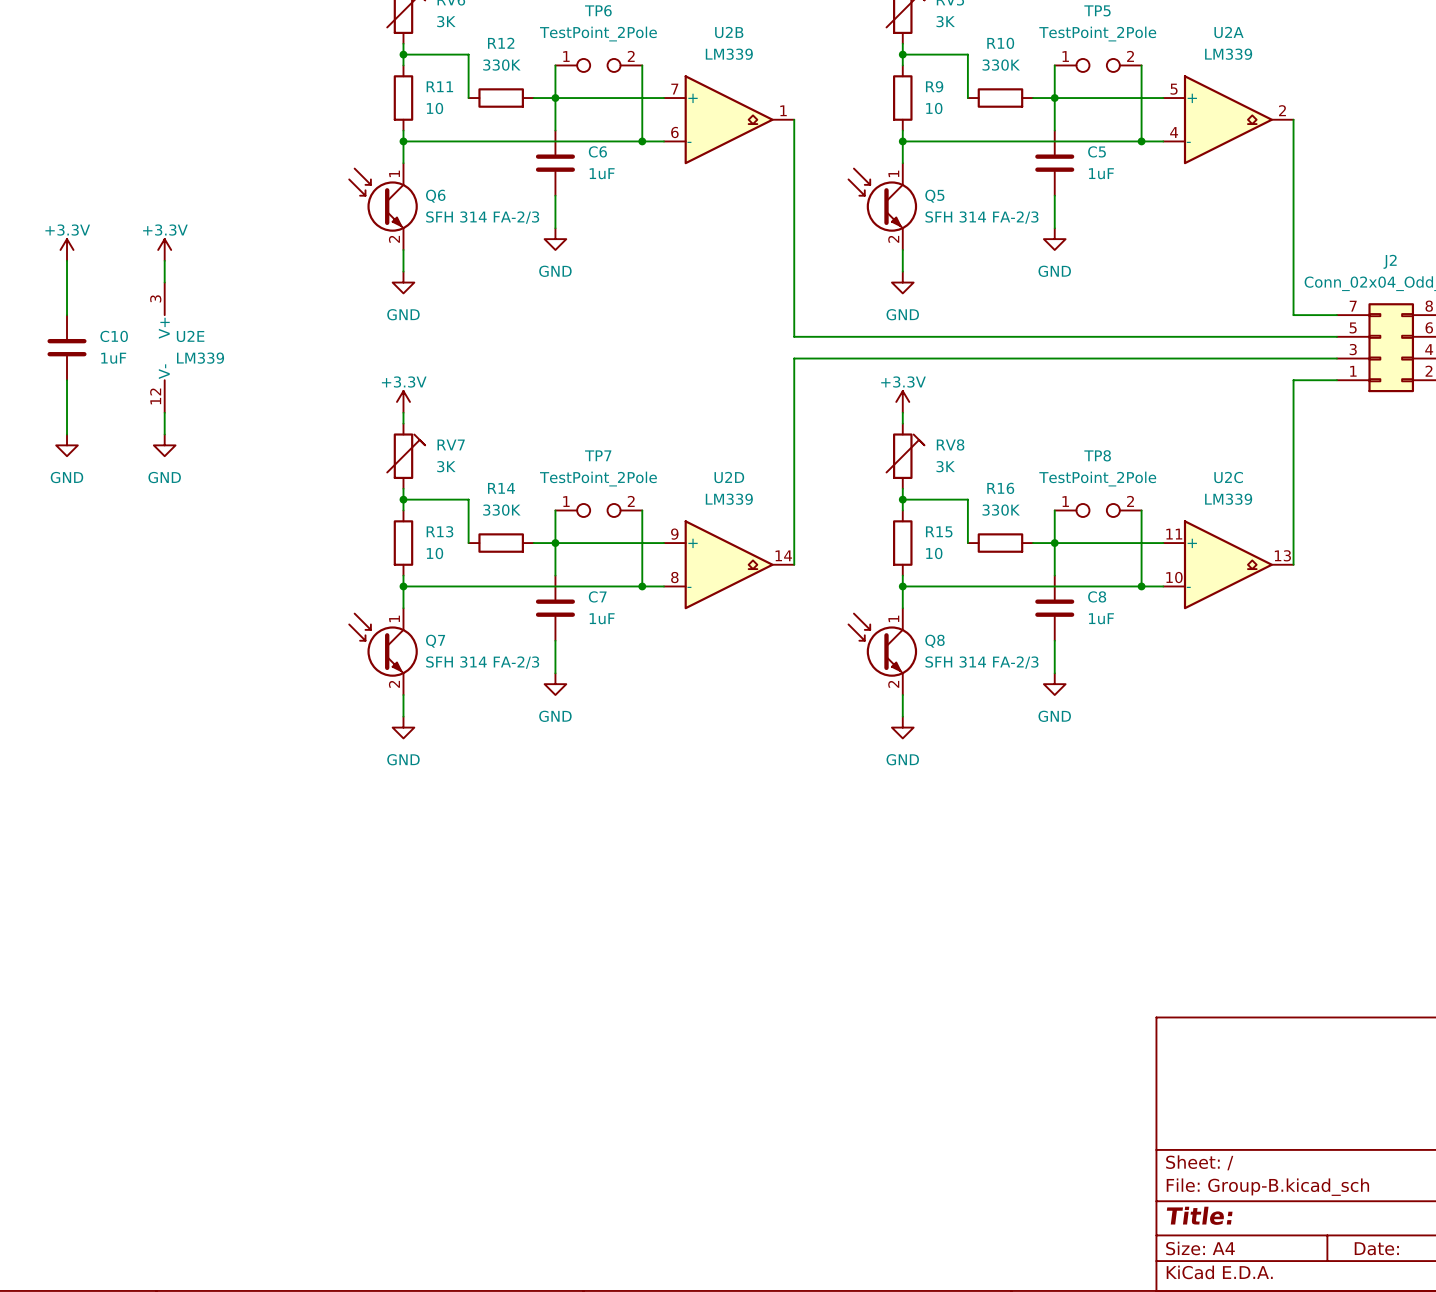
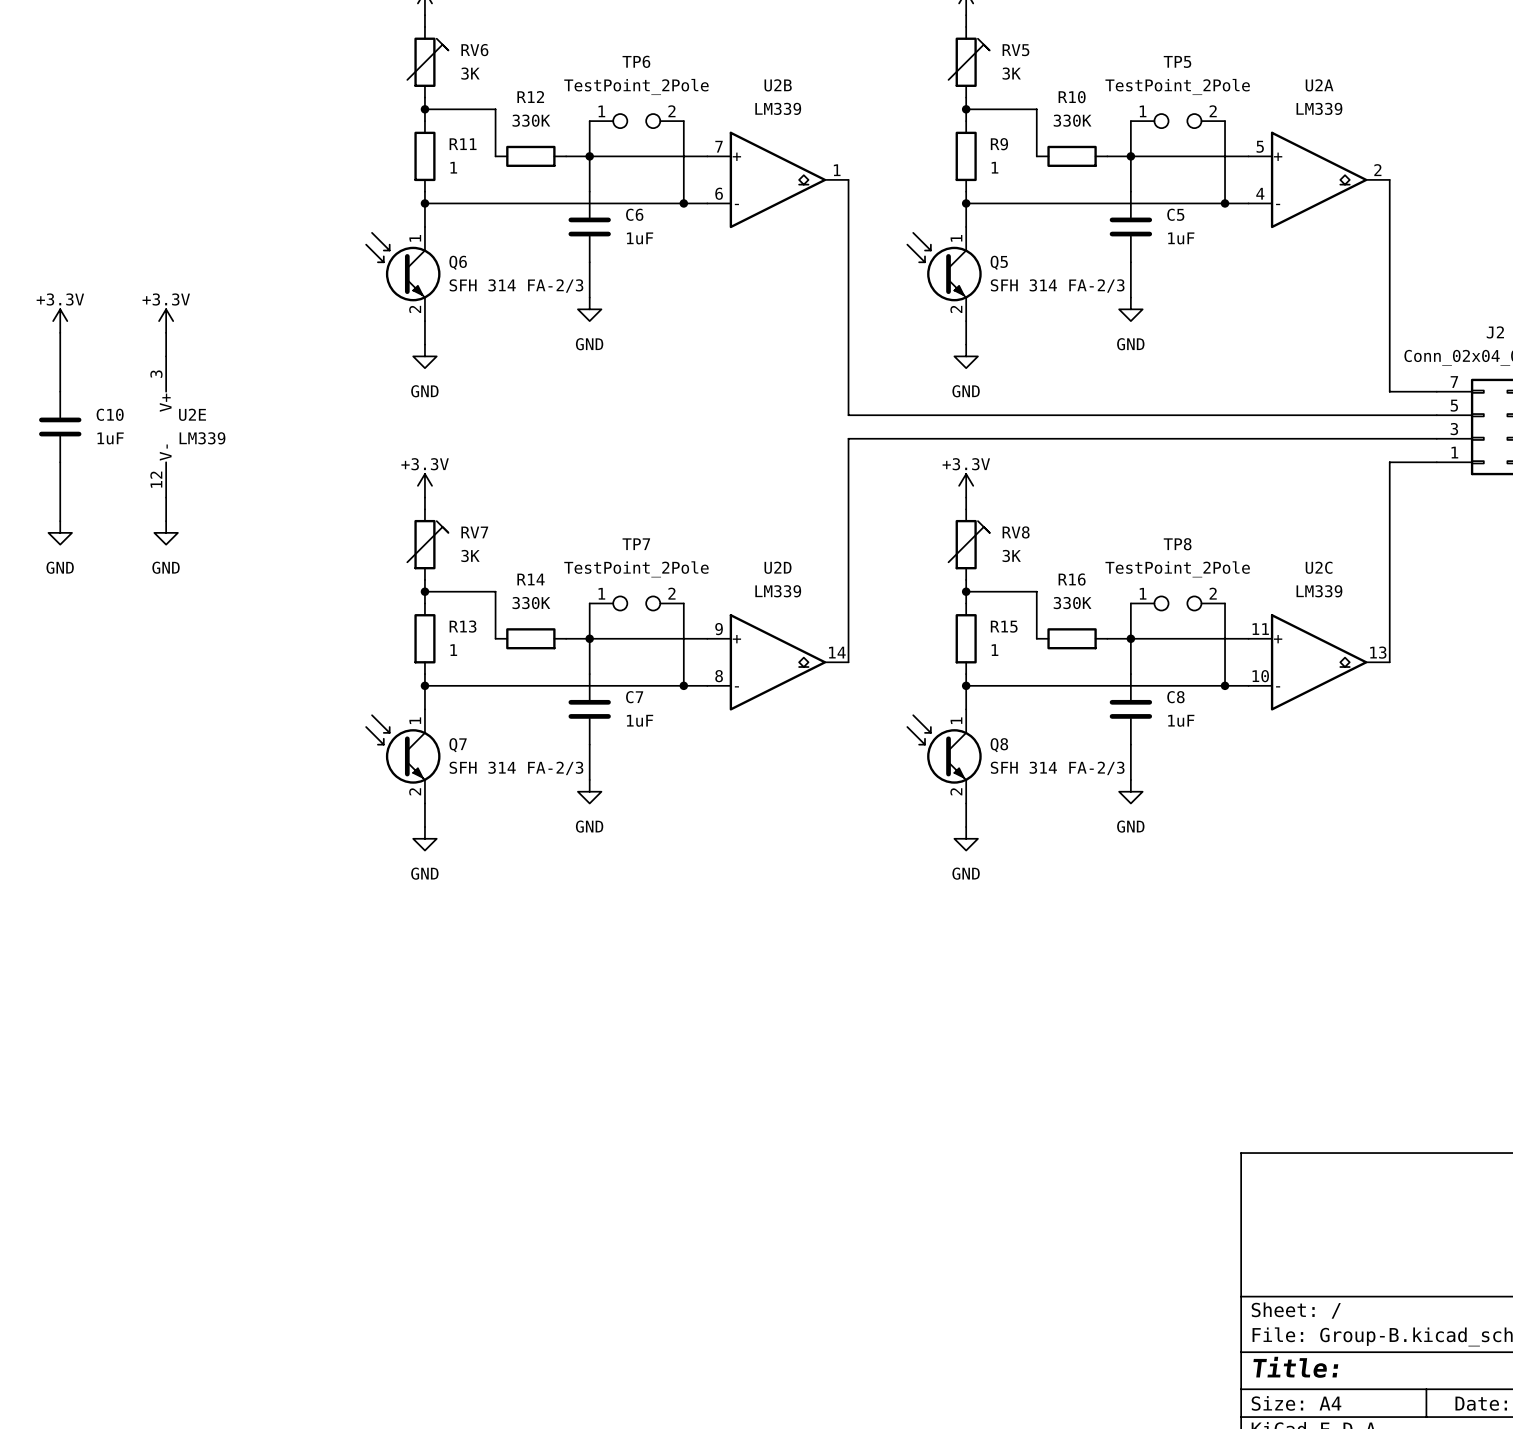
R11 value: 10 (434, 108) -> 1 (453, 167)
R9 value: 10 (934, 108) -> 1 (994, 167)
R13 value: 10 (434, 553) -> 1 (453, 650)
R15 value: 10 (934, 553) -> 1 (994, 650)

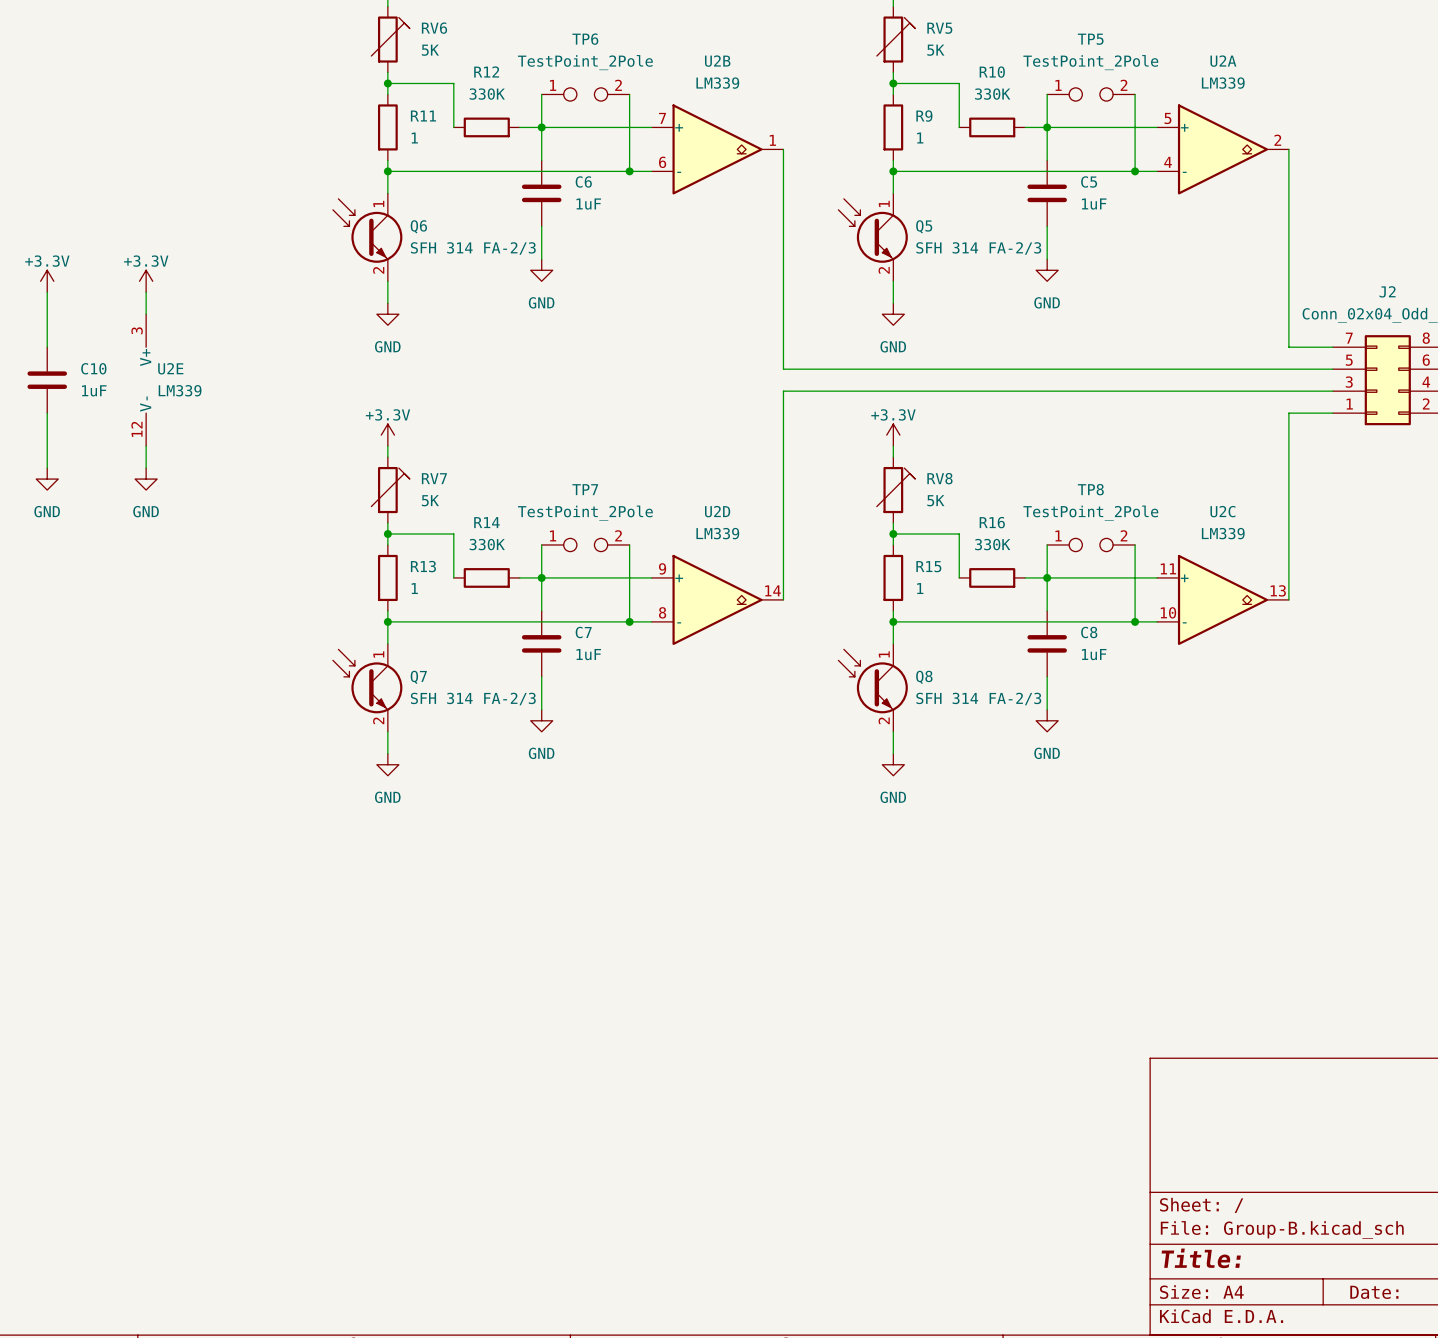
RV6 value: 3K (470, 73) -> 5K (430, 50)
RV5 value: 3K (1011, 73) -> 5K (935, 50)
RV7 value: 3K (470, 555) -> 5K (430, 500)
RV8 value: 3K (1011, 555) -> 5K (935, 500)

